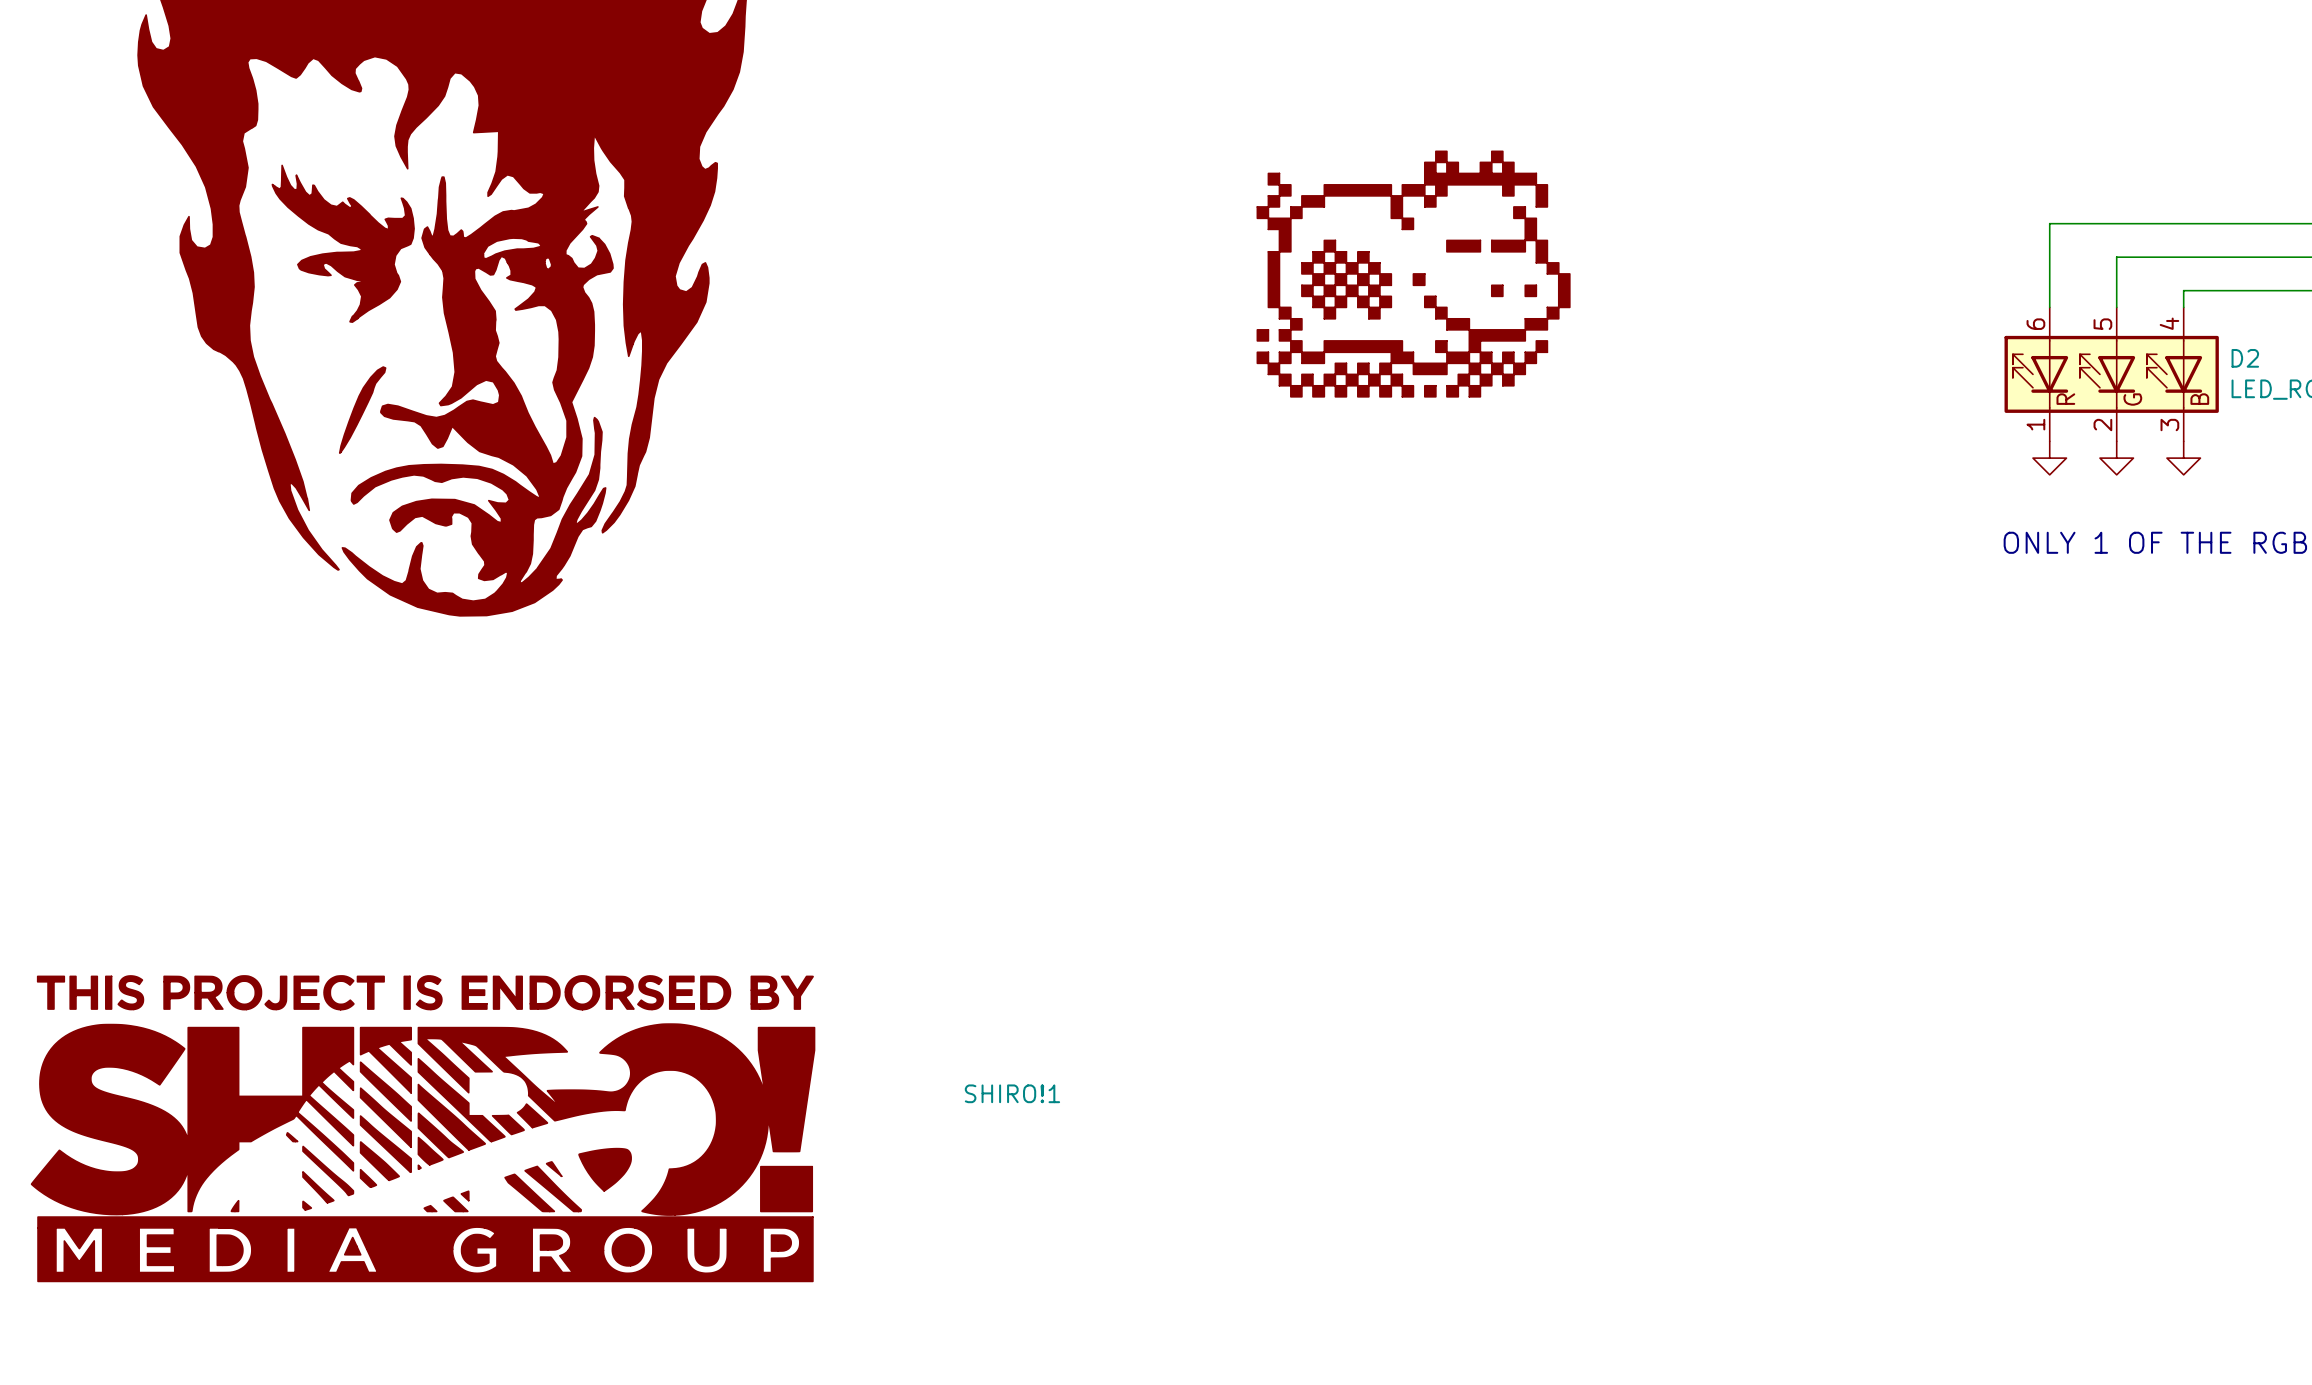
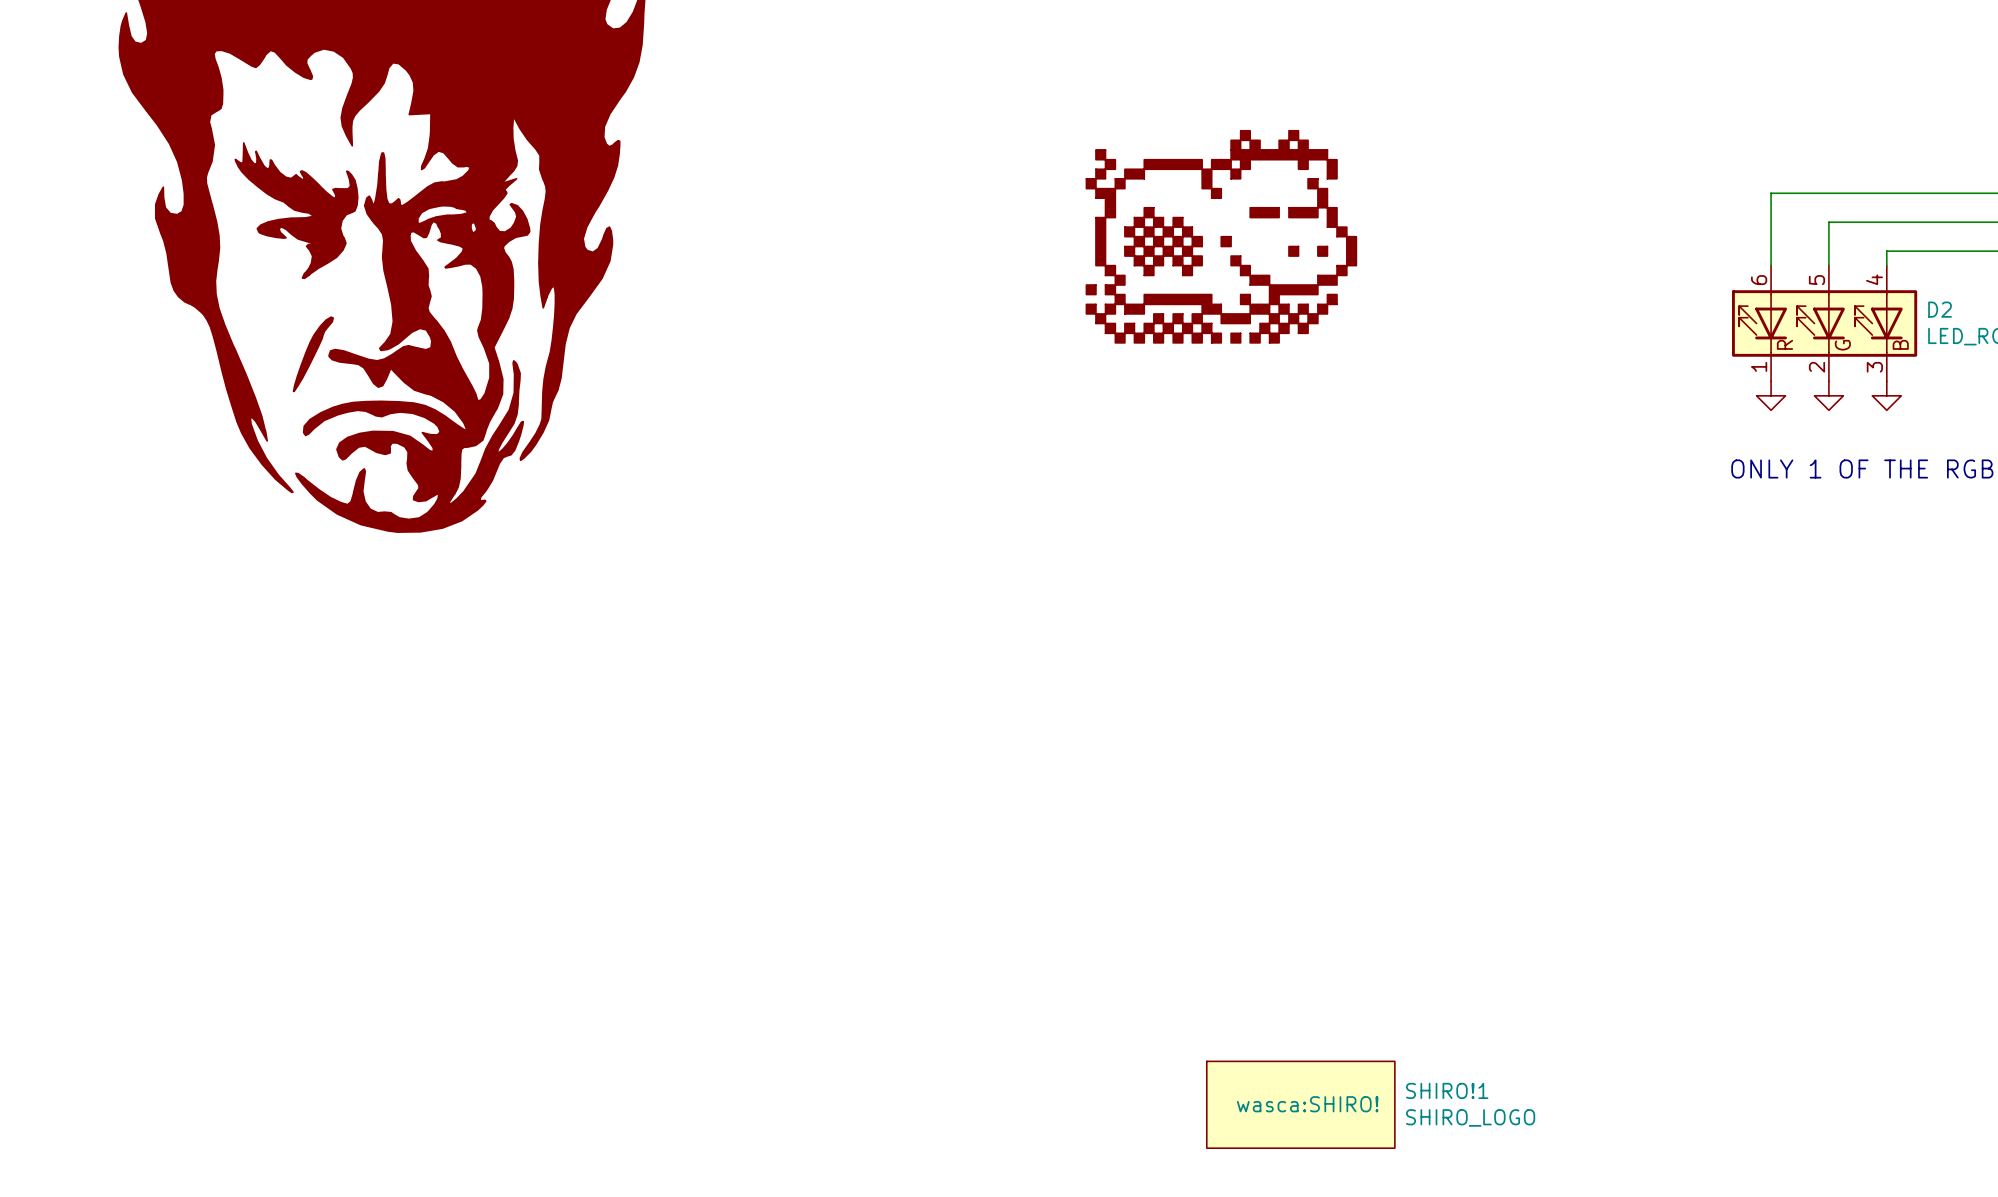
SHIRO!1 symbol: [31, 975, 815, 1282] -> [1206, 1061, 1395, 1149]
SHIRO!1 name position: SHIRO!1 (1012, 1093) -> SHIRO!1 (1447, 1090)
SHIRO!1 text: none -> wasca:SHIRO! (1307, 1104)
SHIRO!1 value: none -> SHIRO_LOGO (1470, 1117)

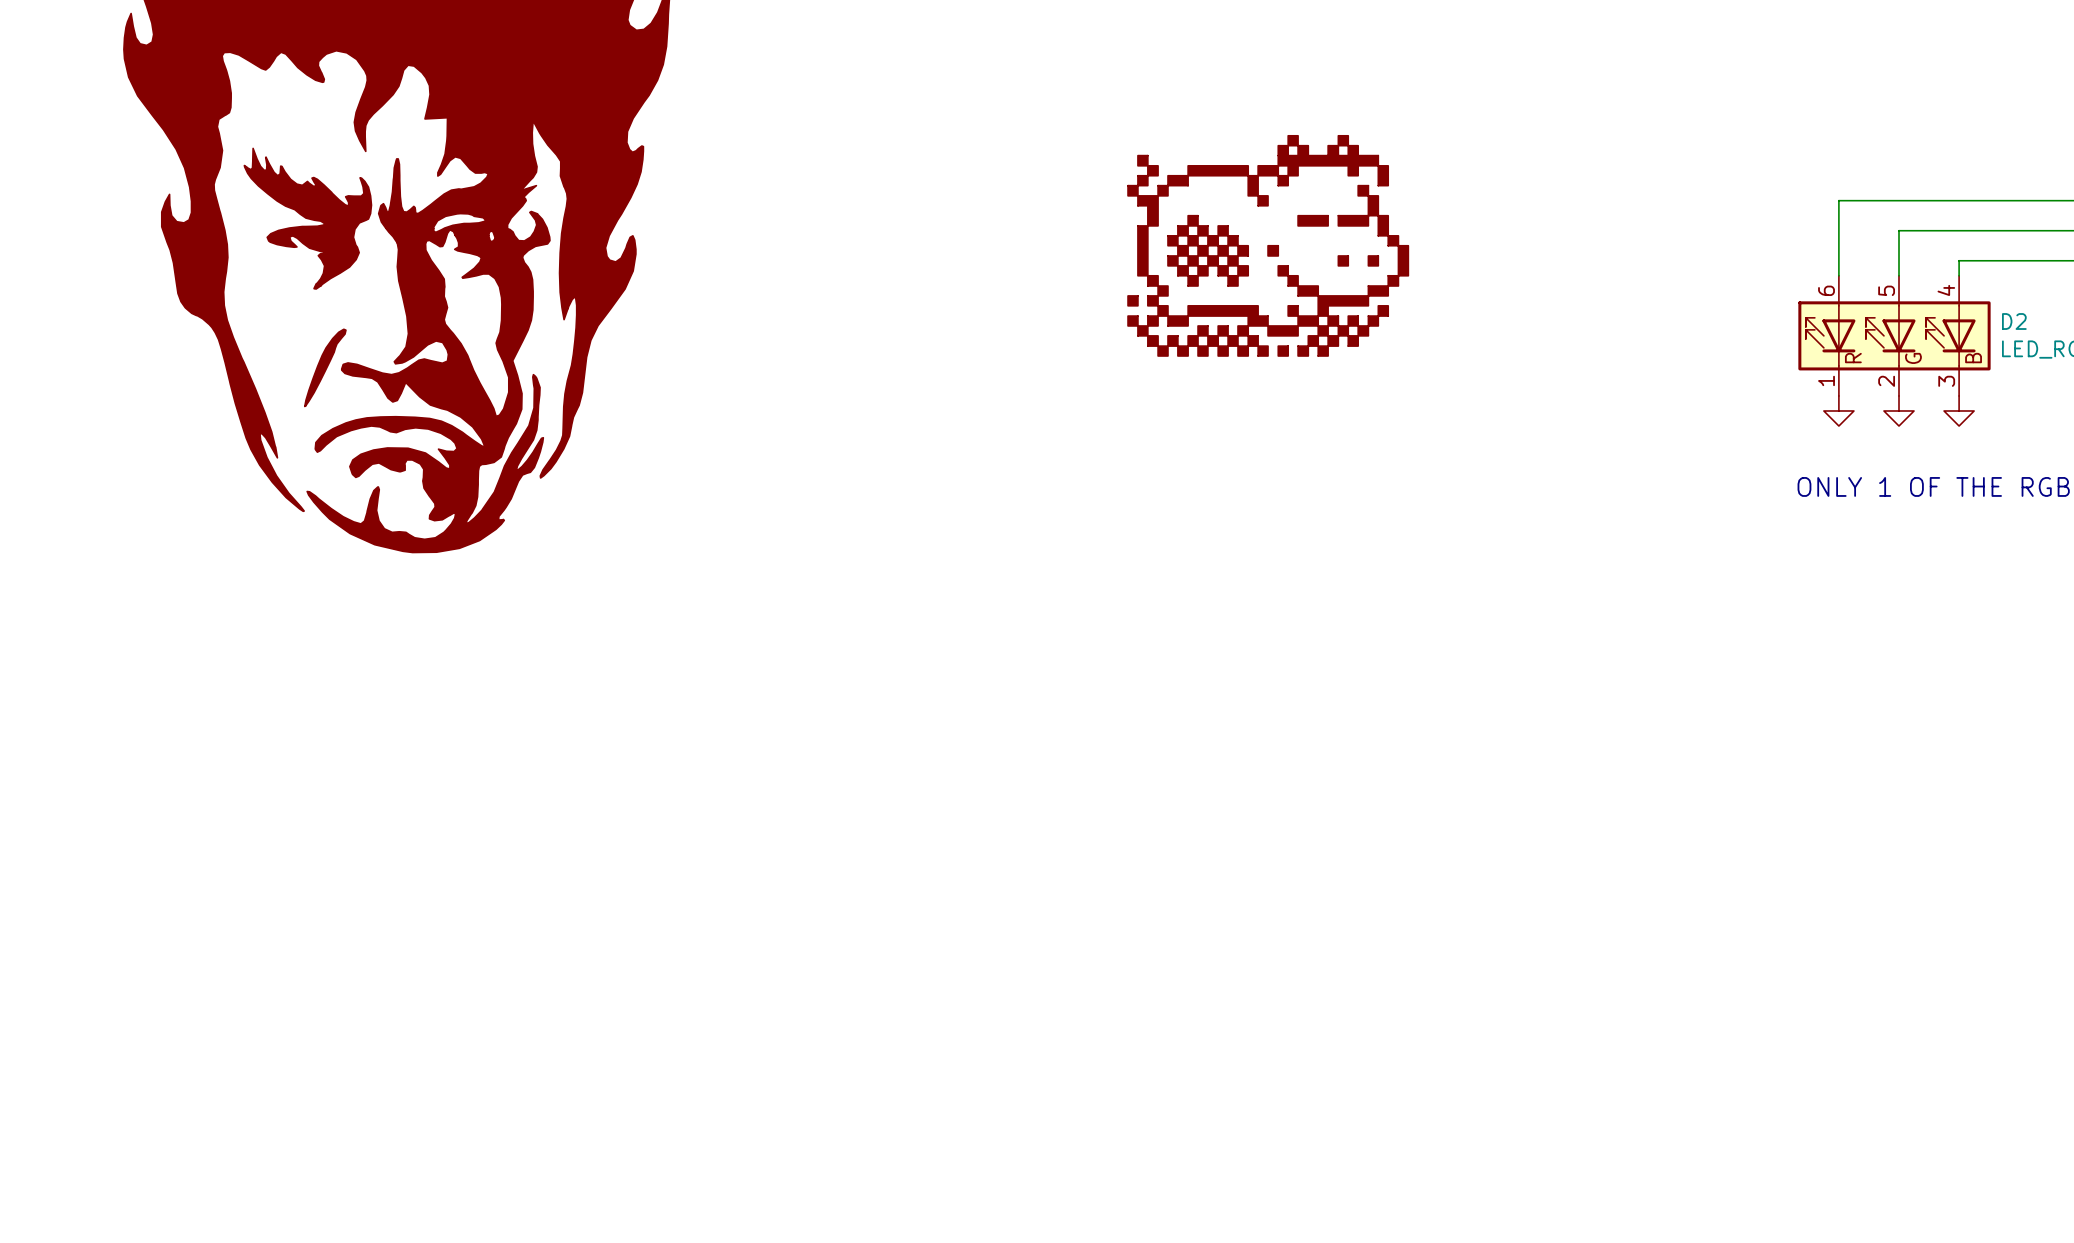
SHIRO!1: SHIRO_LOGO (1300, 1104) -> none

